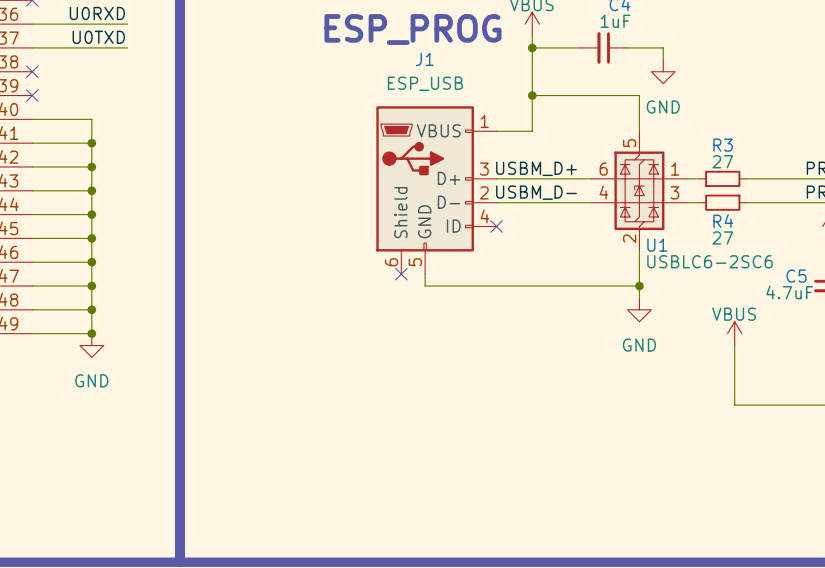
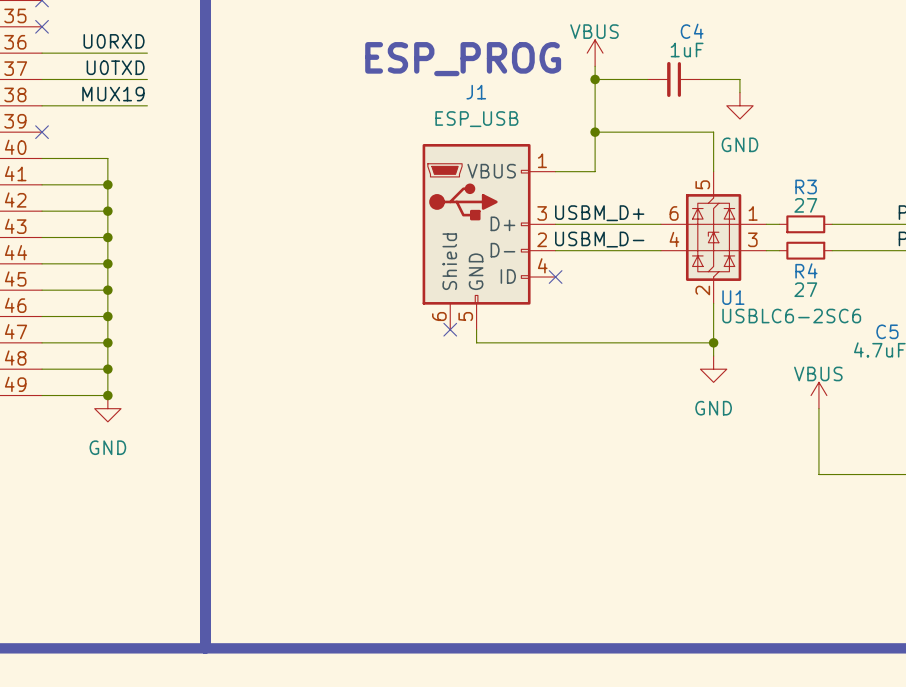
label: none -> MUX19 (113, 94)
wire: none -> (42, 105) (147, 105)
no-connect mark: (32, 71) -> none

